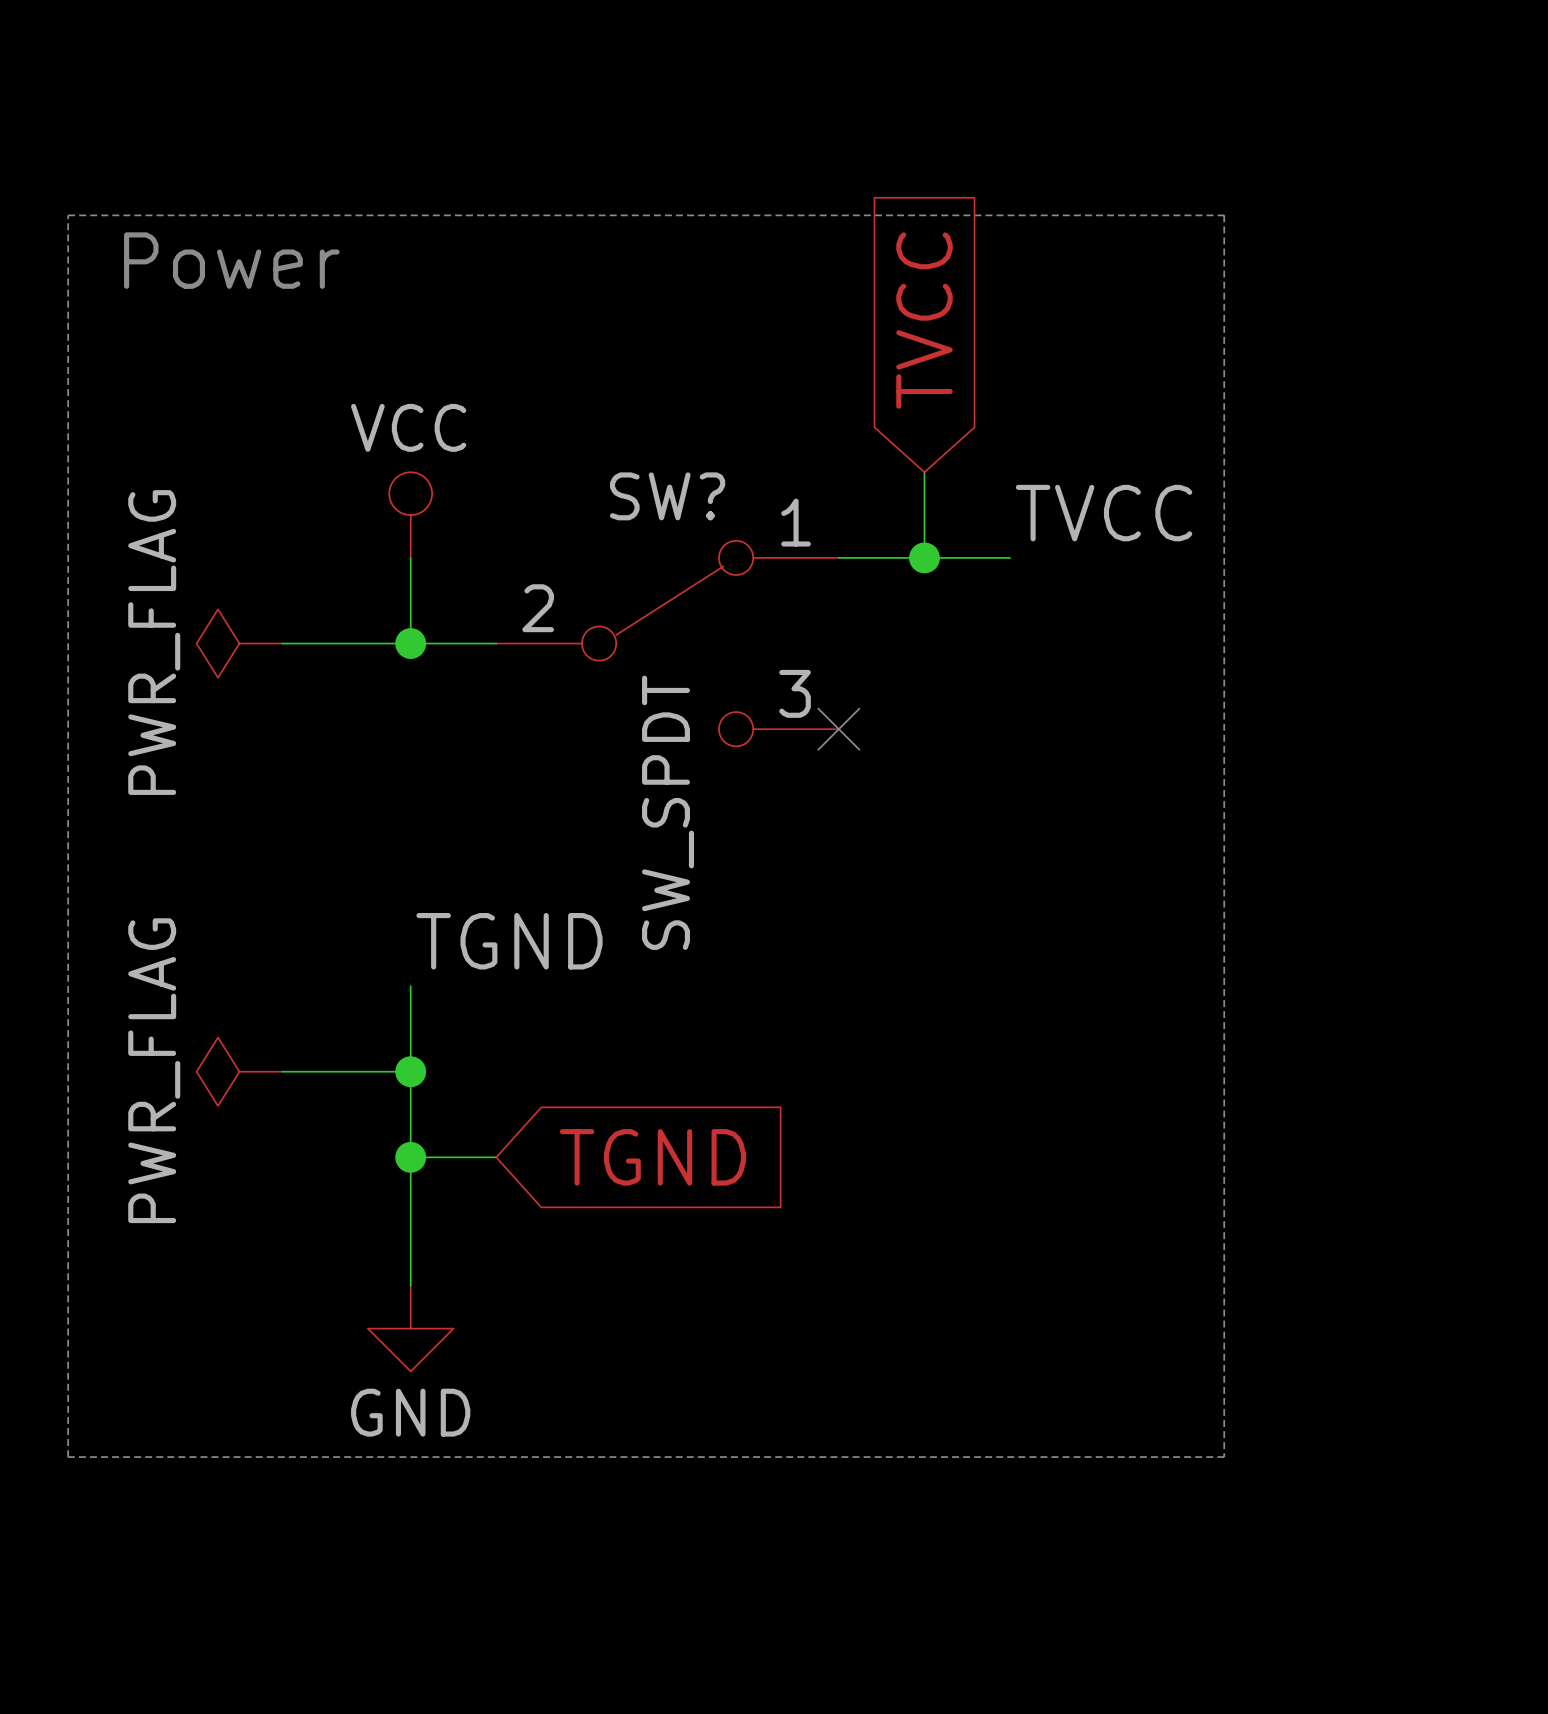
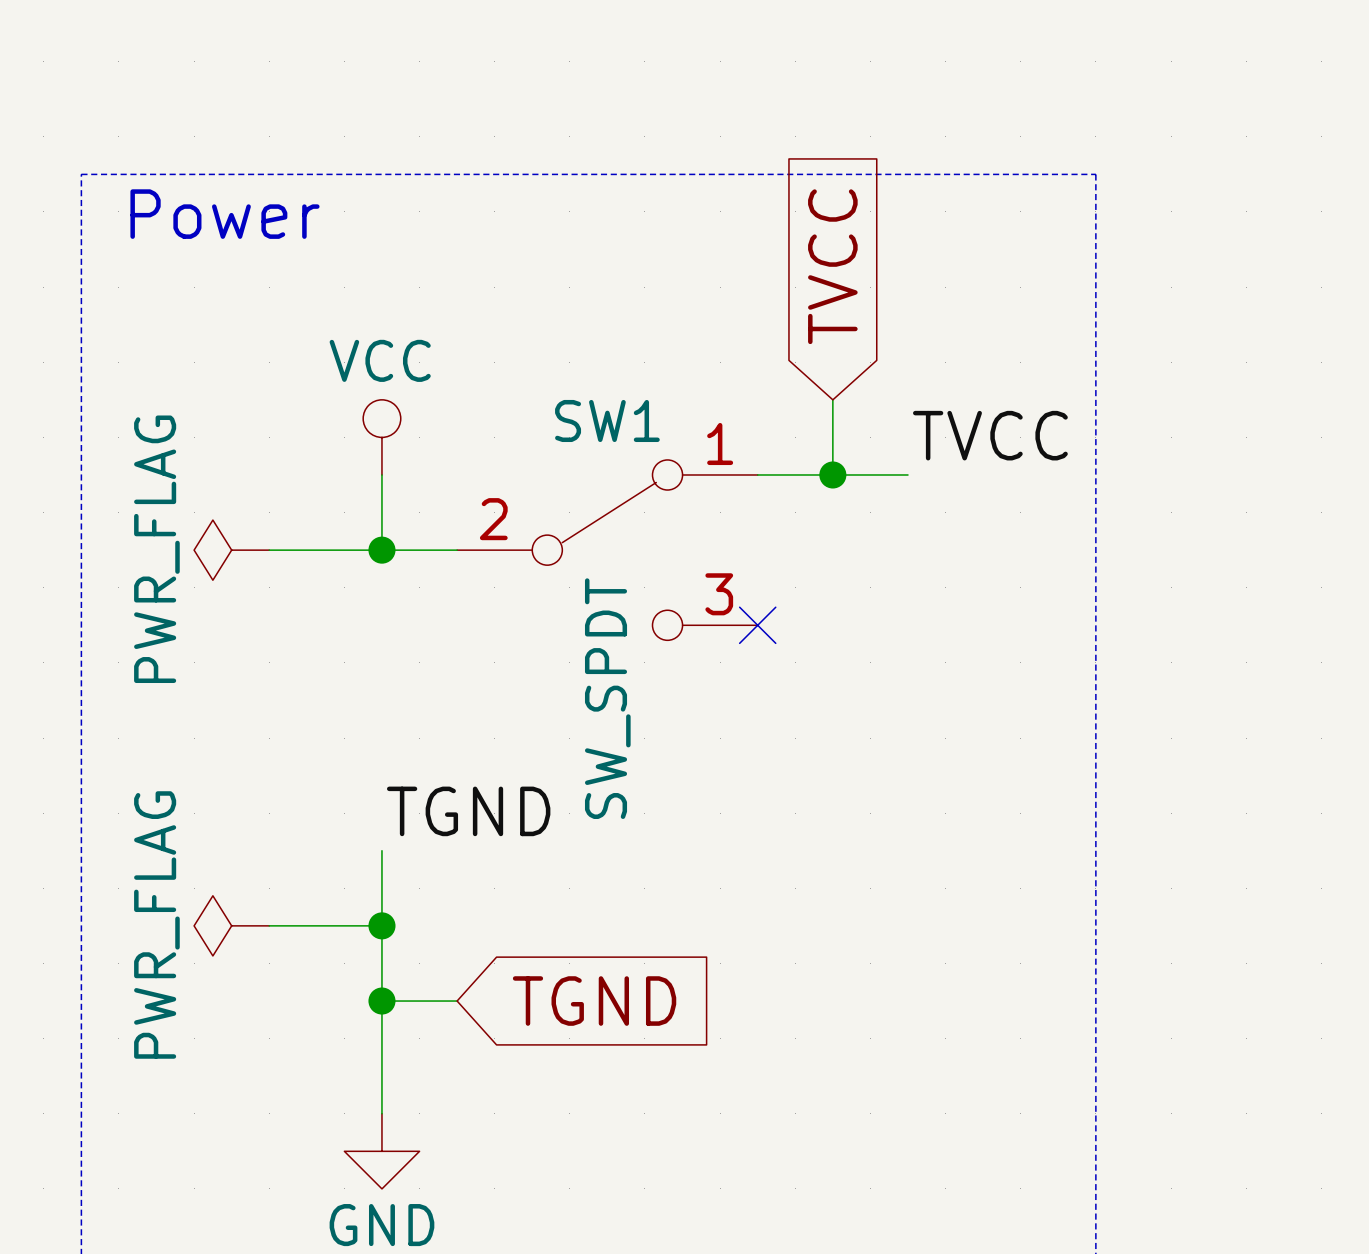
SW? name: SW? (667, 496) -> SW1 (607, 420)

